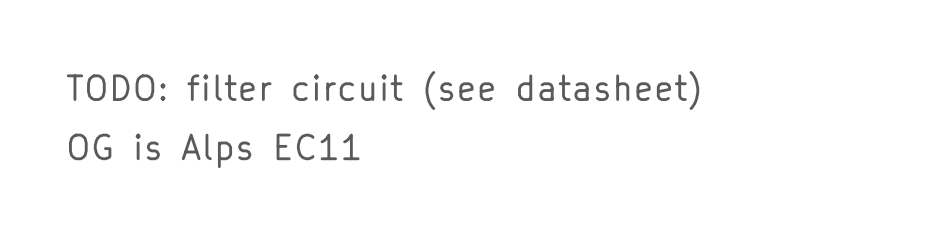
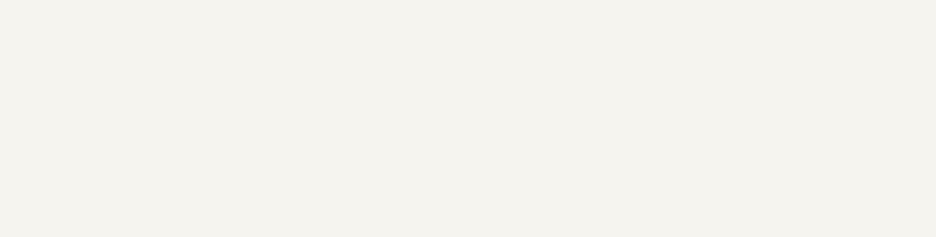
text: TODO: filter circuit (see datasheet) (382, 90) -> none
text: OG is Alps EC11 (214, 150) -> none

